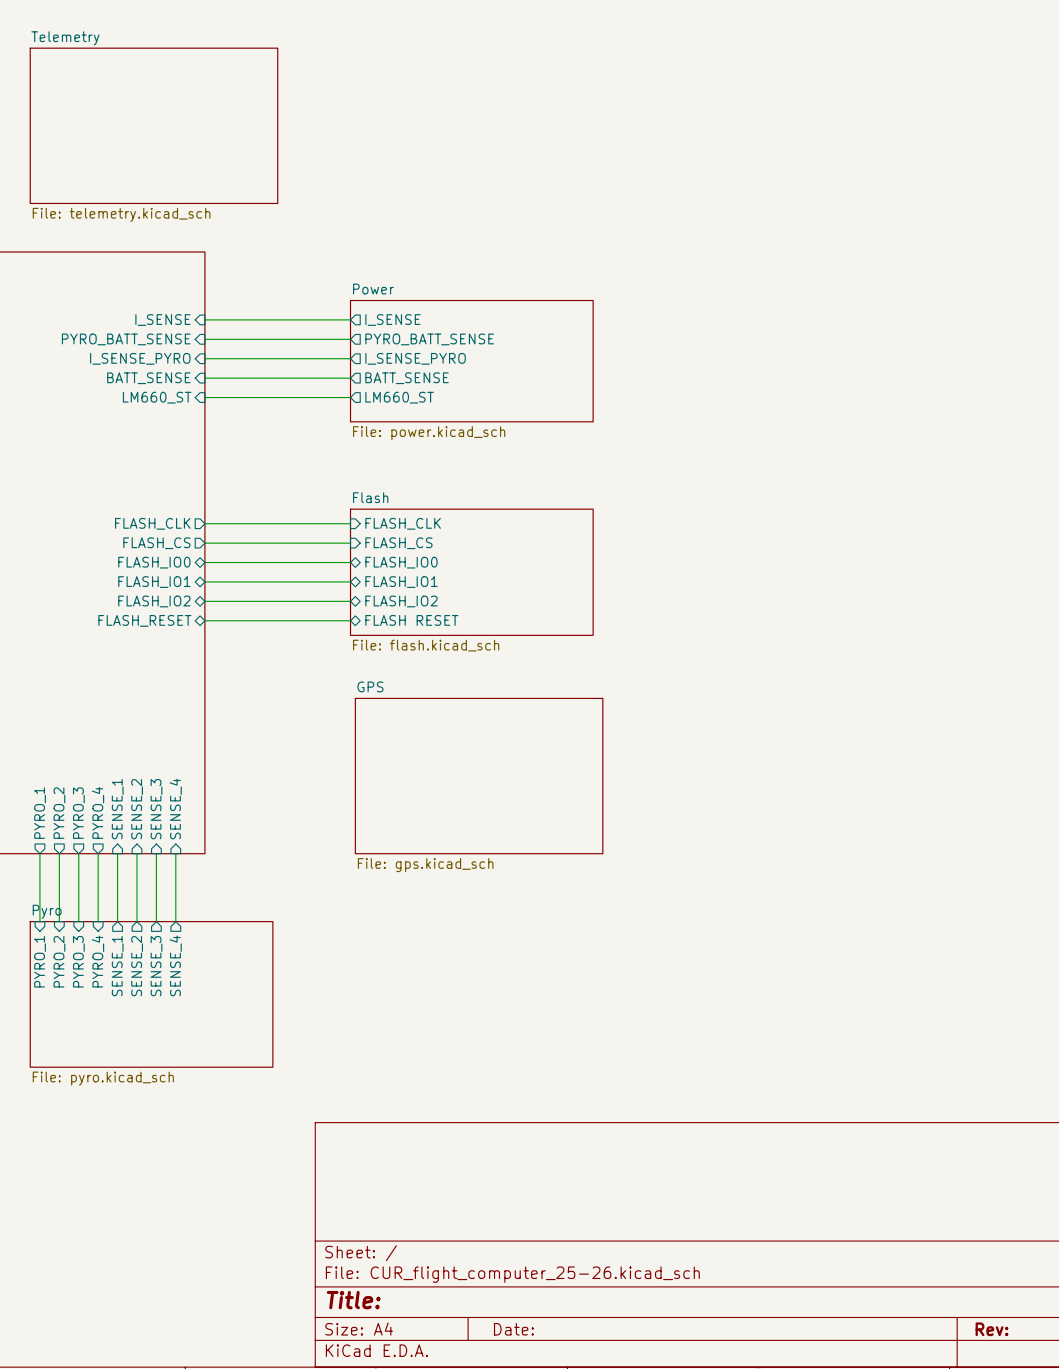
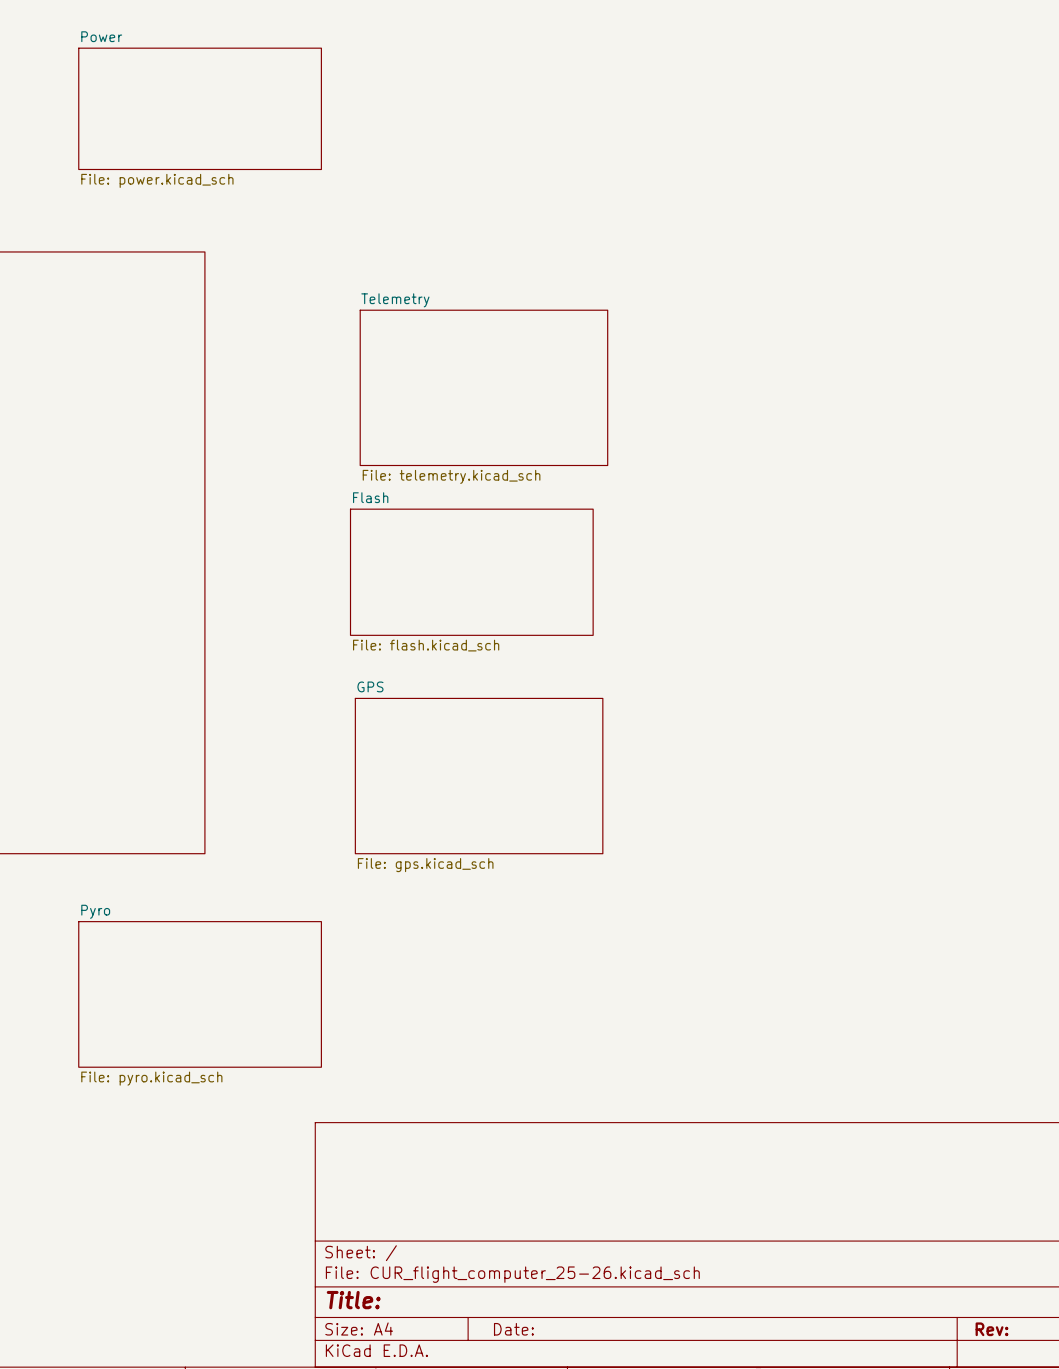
sheet Power: none -> File: power.kicad_sch (200, 108)
sheet Telemetry: File: telemetry.kicad_sch (153, 125) -> none
wire: (204, 319) (350, 319) -> none
sheet pin: I_SENSE (162, 320) -> none
sheet pin: I_SENSE (392, 320) -> none
sheet pin: PYRO_BATT_SENSE (126, 339) -> none
wire: (204, 339) (350, 339) -> none
sheet pin: PYRO_BATT_SENSE (429, 339) -> none
sheet pin: I_SENSE_PYRO (140, 358) -> none
wire: (204, 358) (350, 358) -> none
sheet pin: I_SENSE_PYRO (415, 358) -> none
sheet Power: File: power.kicad_sch (471, 361) -> none
sheet pin: BATT_SENSE (148, 378) -> none
wire: (204, 378) (350, 378) -> none
sheet pin: BATT_SENSE (407, 378) -> none
sheet Telemetry: none -> File: telemetry.kicad_sch (483, 387)
sheet pin: LM660_ST (157, 397) -> none
wire: (204, 397) (350, 397) -> none
sheet pin: LM660_ST (399, 397) -> none
sheet pin: FLASH_CLK (152, 523) -> none
wire: (204, 523) (350, 523) -> none
sheet pin: FLASH_CLK (403, 523) -> none
sheet pin: FLASH_CS (156, 543) -> none
wire: (204, 543) (350, 543) -> none
sheet pin: FLASH_CS (398, 543) -> none
sheet pin: FLASH_IO0 (154, 562) -> none
wire: (204, 562) (350, 562) -> none
sheet pin: FLASH_IO0 (401, 562) -> none
wire: (204, 581) (350, 581) -> none
sheet pin: FLASH_IO1 (154, 582) -> none
sheet pin: FLASH_IO1 (401, 582) -> none
sheet pin: FLASH_IO2 (154, 601) -> none
wire: (204, 601) (350, 601) -> none
sheet pin: FLASH_IO2 (401, 601) -> none
sheet pin: FLASH_RESET (144, 620) -> none
wire: (204, 620) (350, 620) -> none
sheet pin: FLASH RESET (411, 620) -> none
sheet pin: SENSE_4 (175, 808) -> none
sheet pin: SENSE_1 (117, 809) -> none
sheet pin: SENSE_2 (137, 809) -> none
sheet pin: SENSE_3 (156, 809) -> none
sheet pin: PYRO_4 (98, 812) -> none
sheet pin: PYRO_1 (40, 813) -> none
sheet pin: PYRO_2 (59, 813) -> none
sheet pin: PYRO_3 (78, 813) -> none
wire: (39, 853) (39, 921) -> none
wire: (59, 853) (59, 921) -> none
wire: (78, 853) (78, 921) -> none
wire: (98, 853) (98, 921) -> none
wire: (117, 853) (117, 921) -> none
wire: (136, 853) (136, 921) -> none
wire: (156, 853) (156, 921) -> none
wire: (175, 853) (175, 921) -> none
sheet pin: PYRO_1 (40, 961) -> none
sheet pin: PYRO_2 (59, 961) -> none
sheet pin: PYRO_3 (78, 961) -> none
sheet pin: PYRO_4 (98, 961) -> none
sheet pin: SENSE_4 (175, 965) -> none
sheet pin: SENSE_1 (117, 966) -> none
sheet pin: SENSE_2 (137, 966) -> none
sheet pin: SENSE_3 (156, 966) -> none
sheet Pyro position: (151, 994) -> (200, 994)

